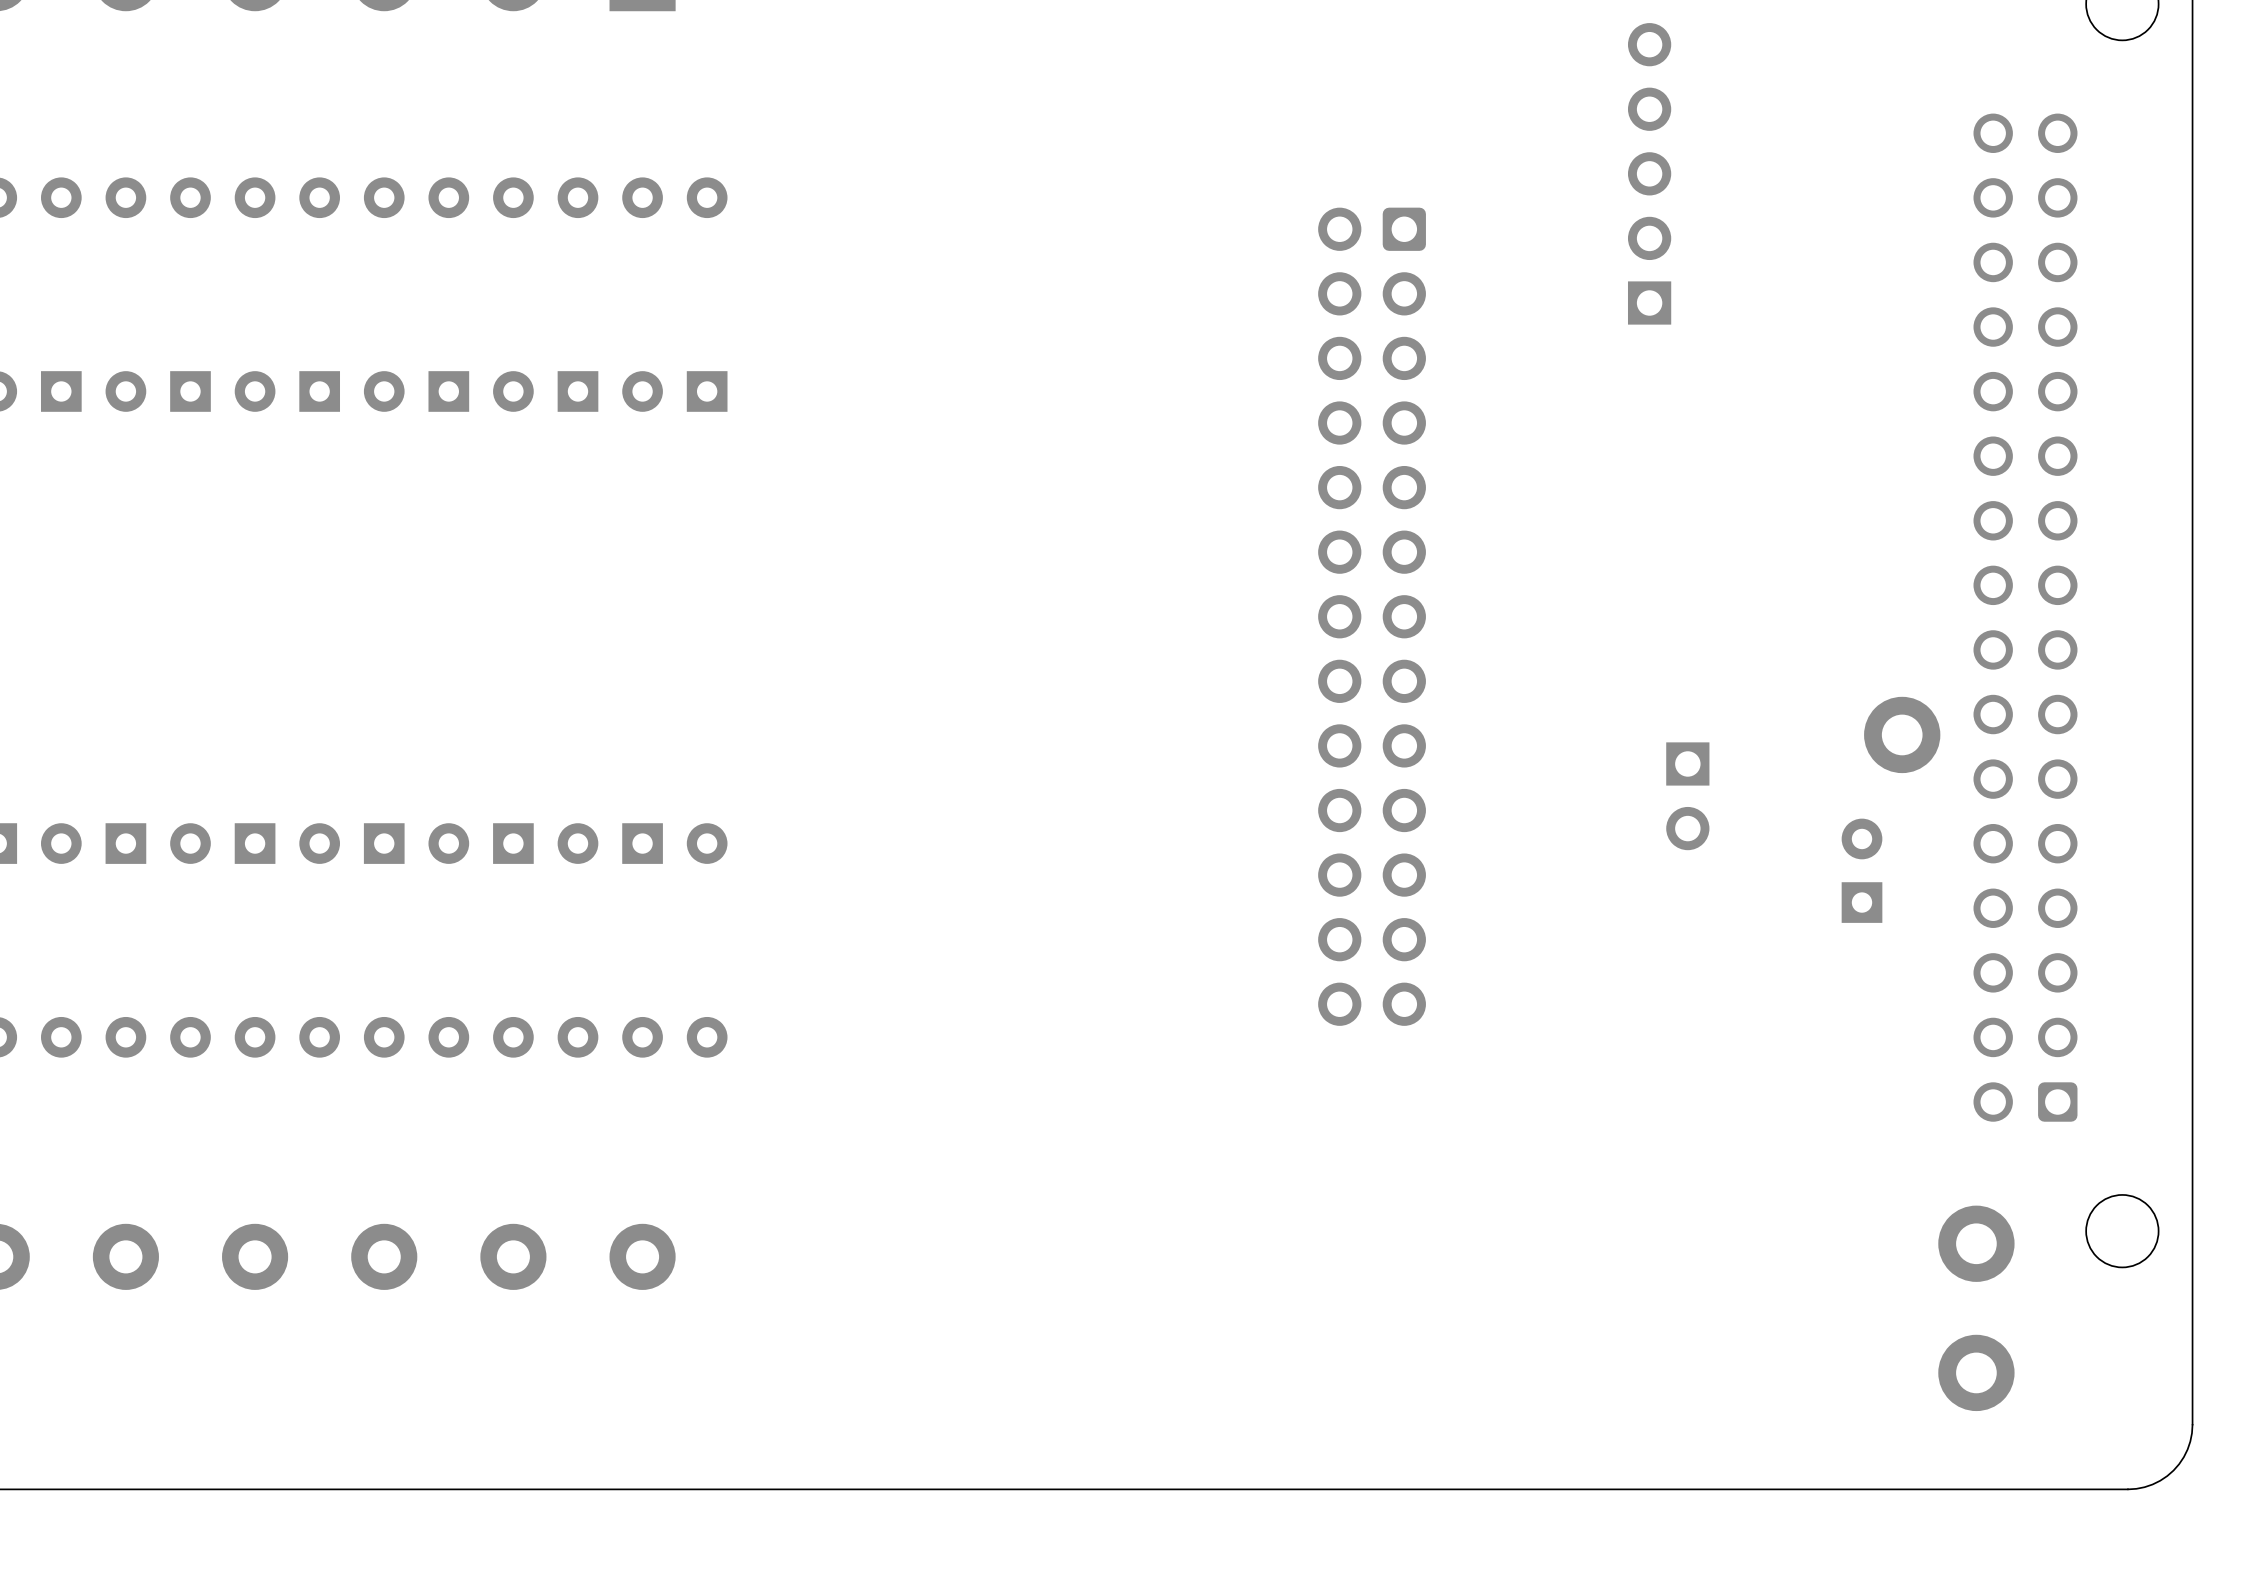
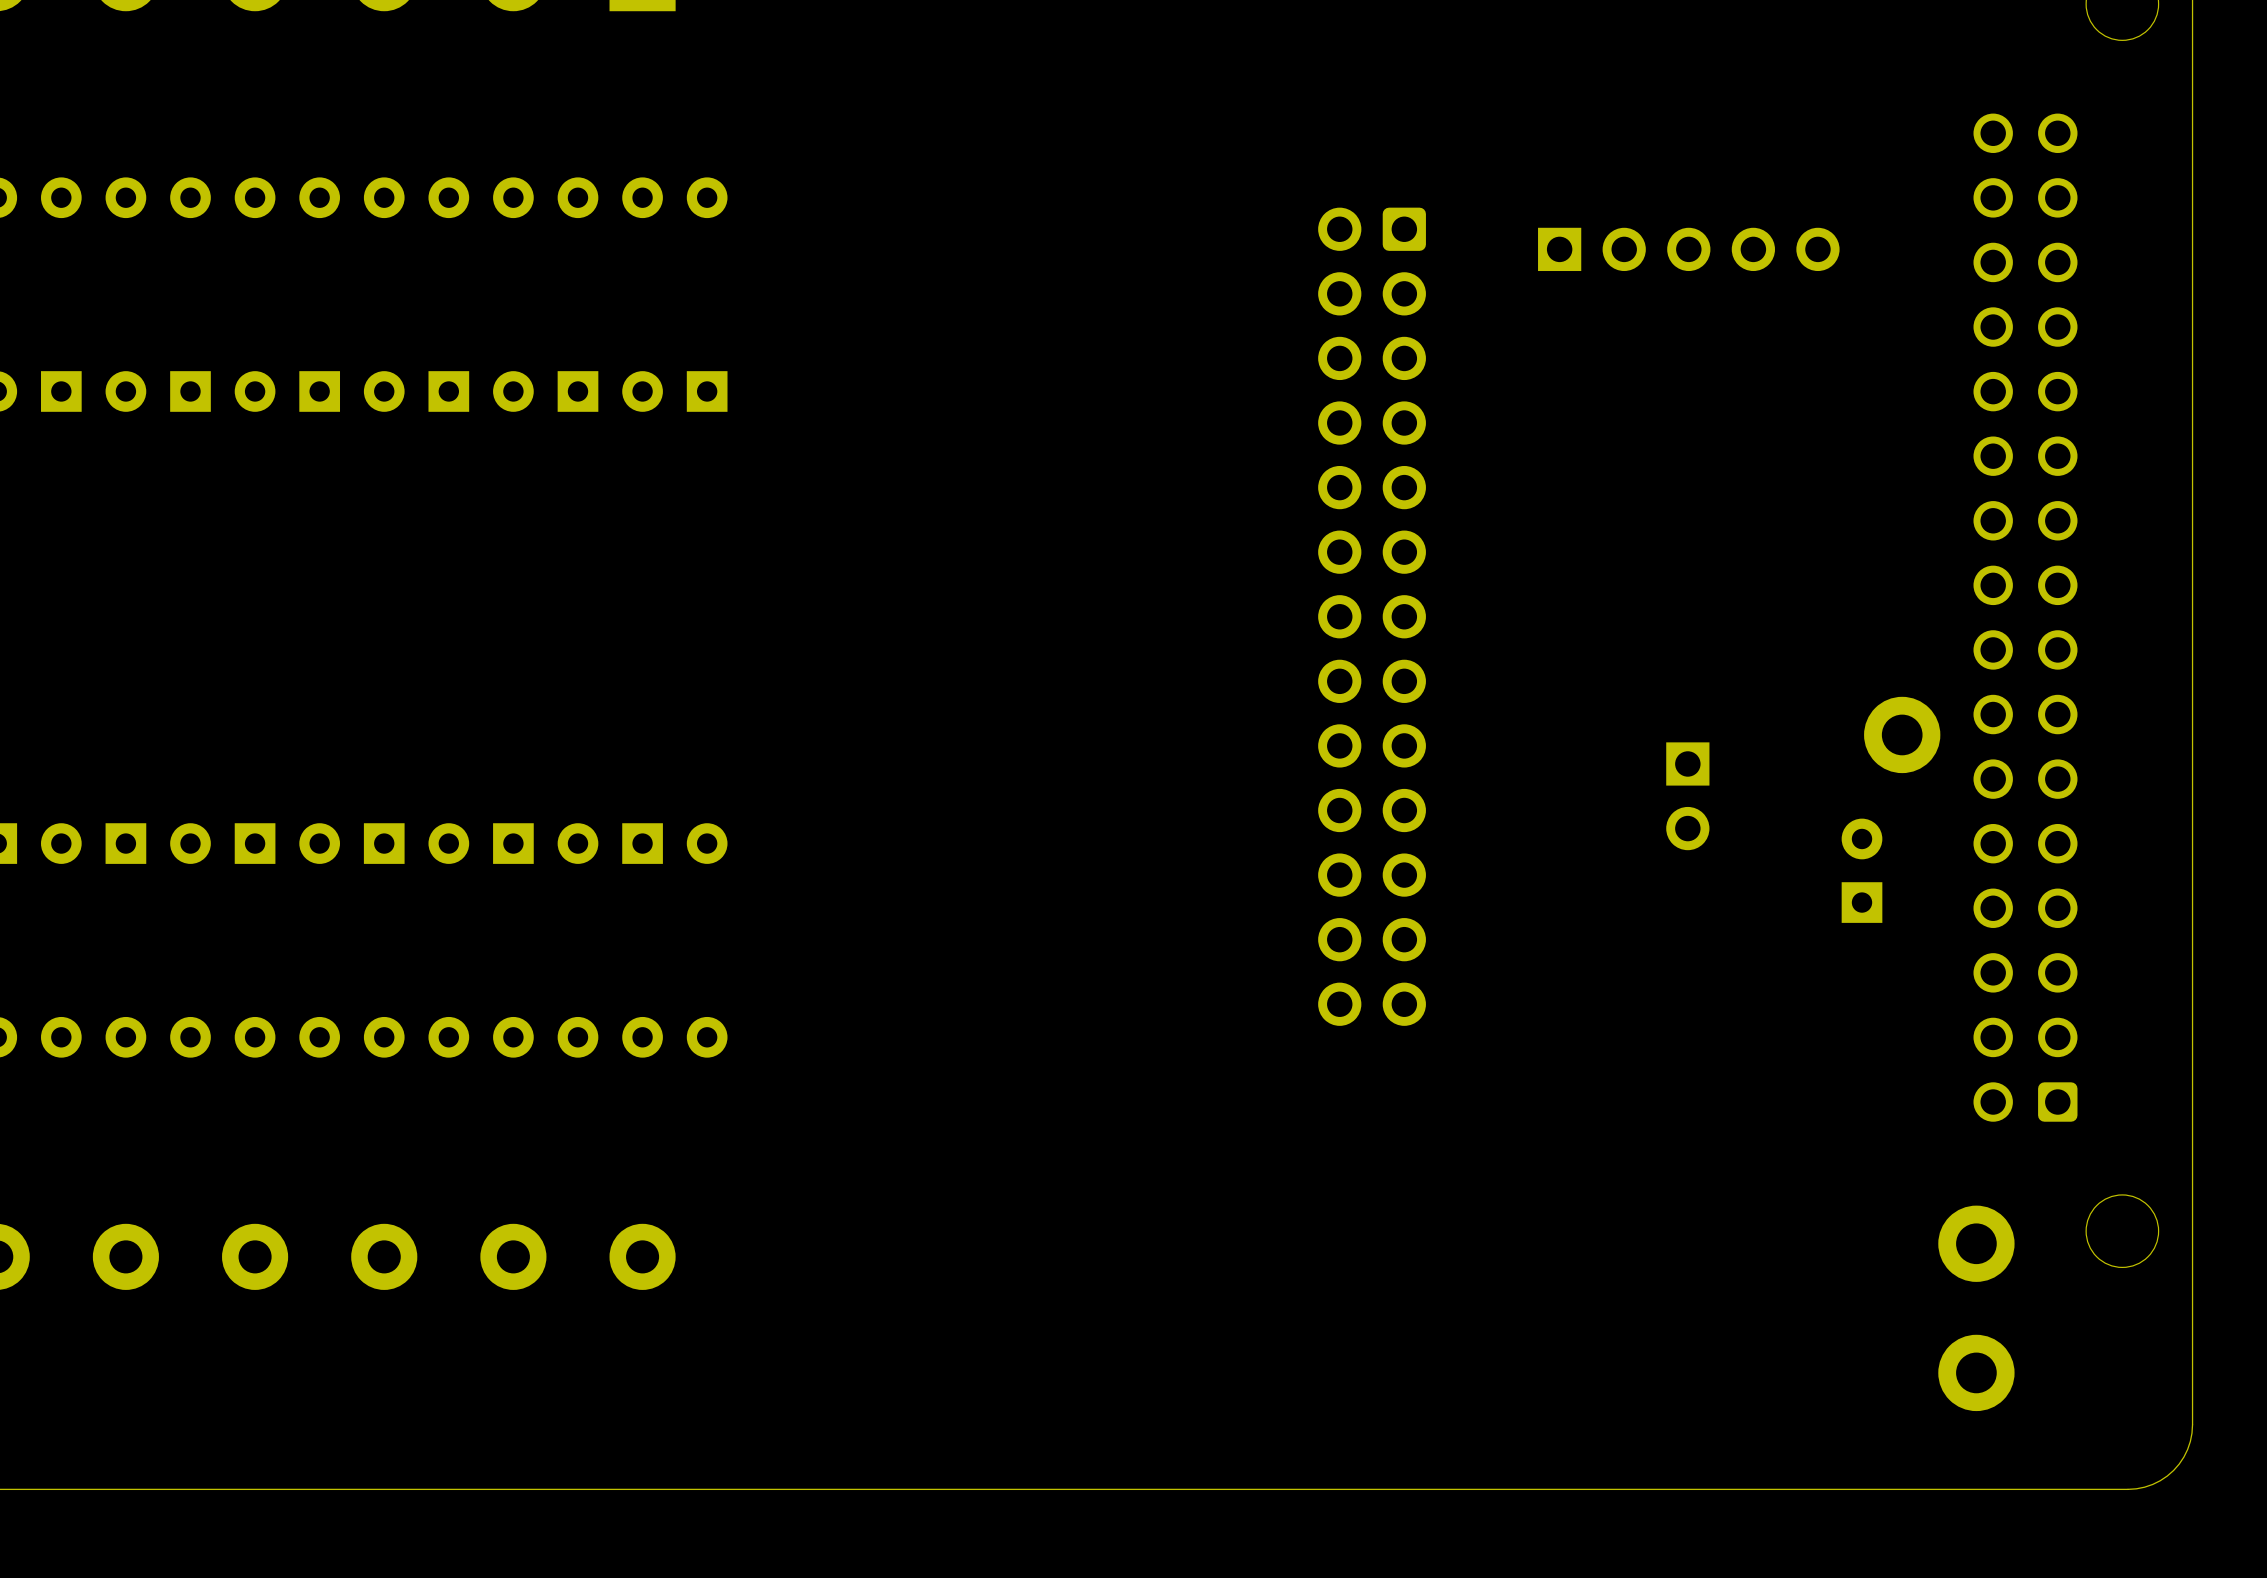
part rotation: 0° (1649, 173) -> 90° clockwise (1688, 249)

